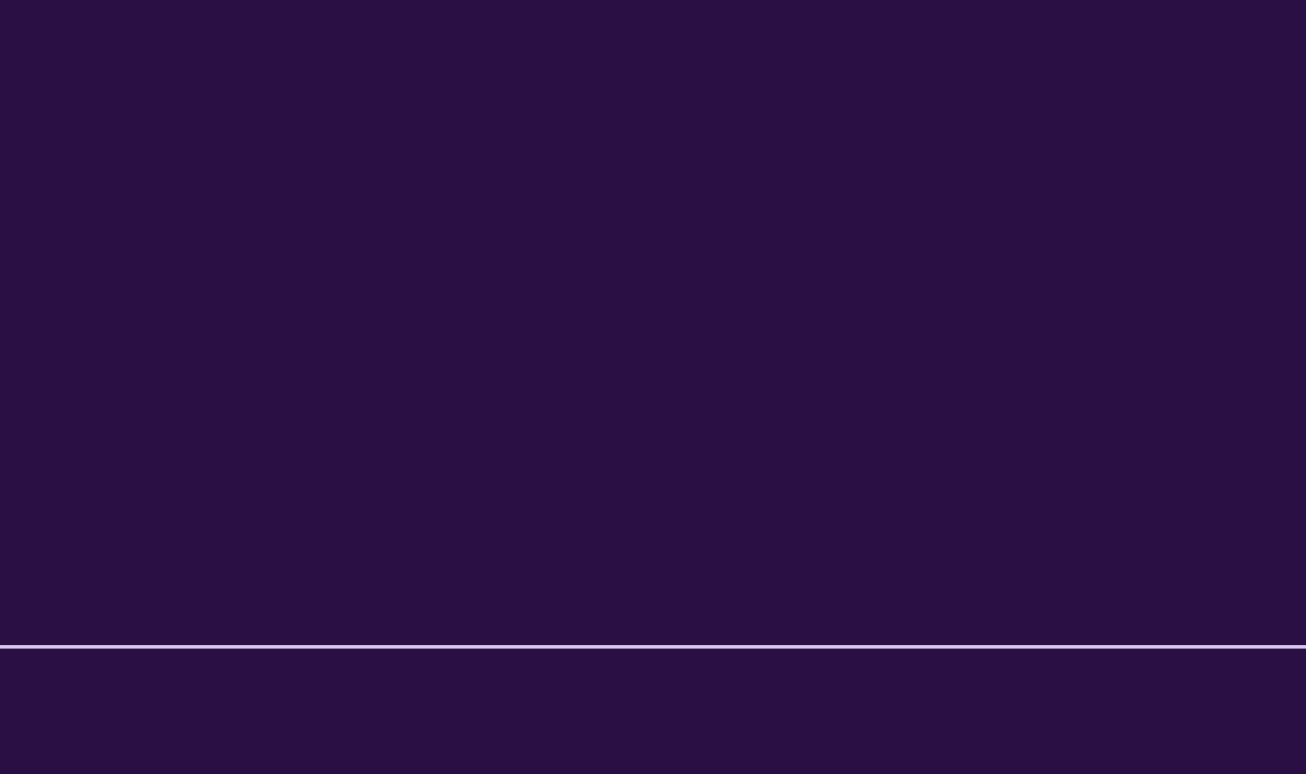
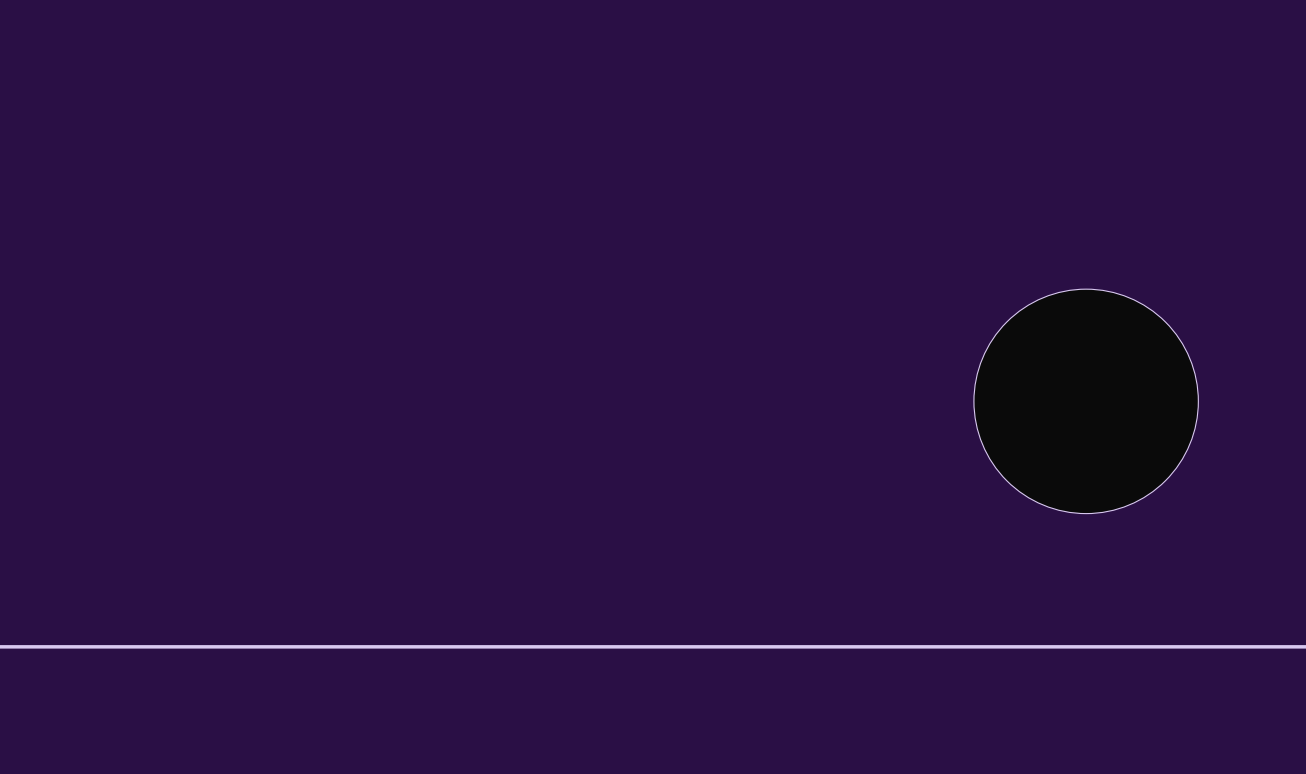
part: none -> (1086, 401)

